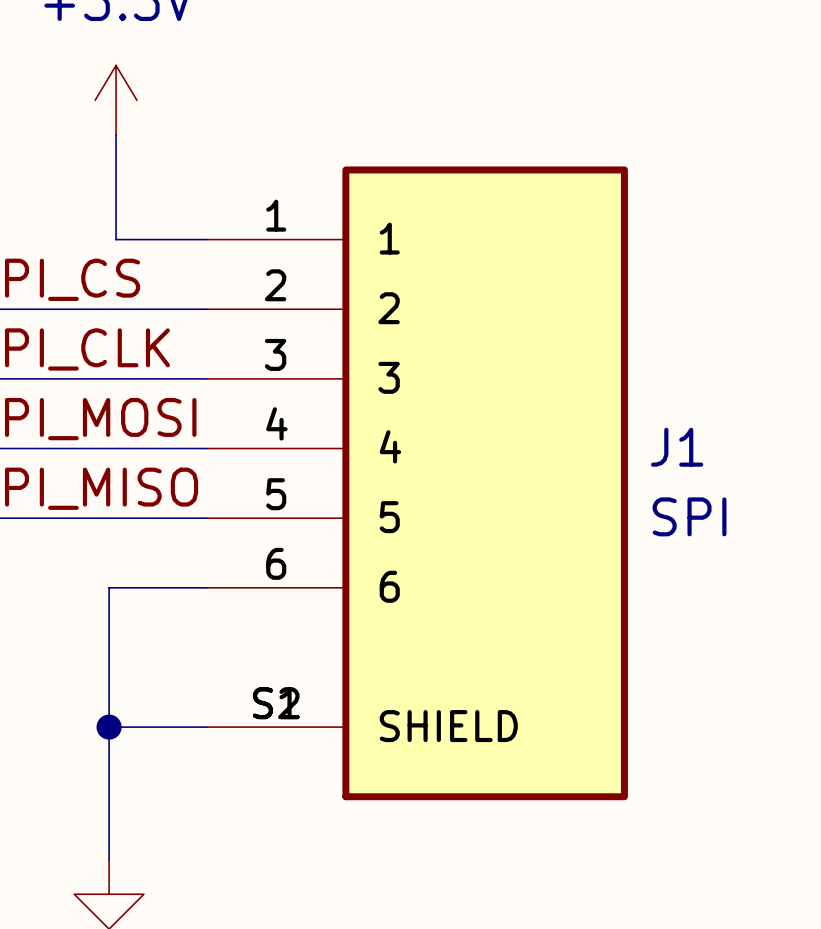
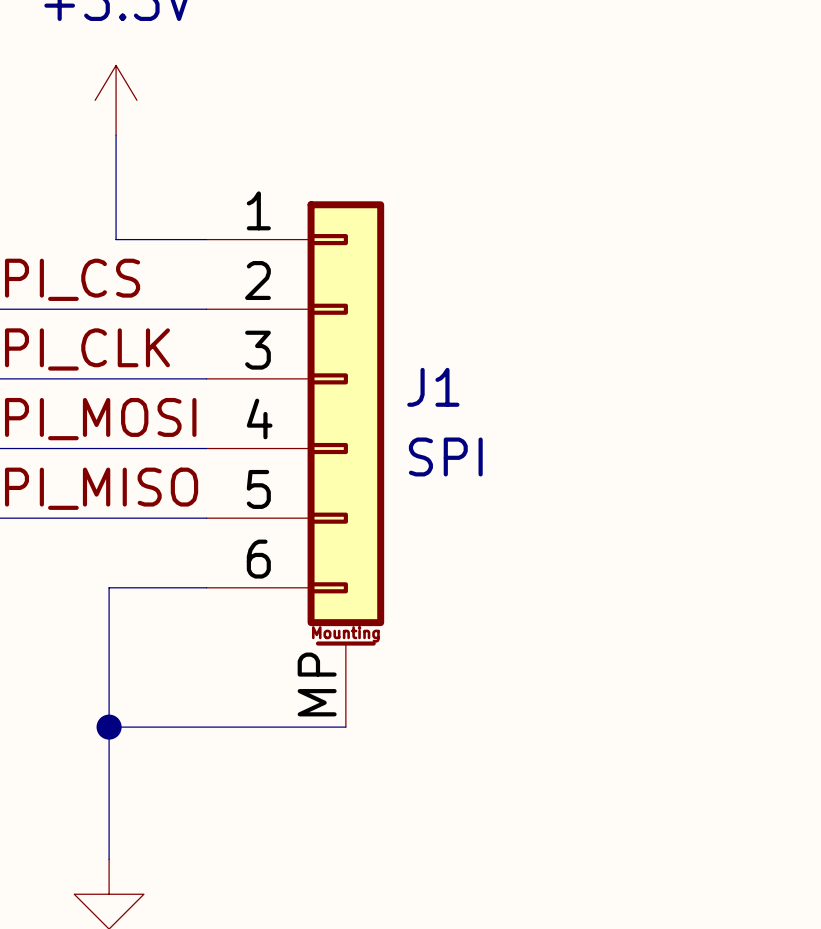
J1 symbol: [206, 166, 628, 801] -> [206, 201, 385, 728]
J1 name position: J1 (677, 447) -> J1 (433, 387)
J1 value position: SPI (689, 516) -> SPI (445, 456)

